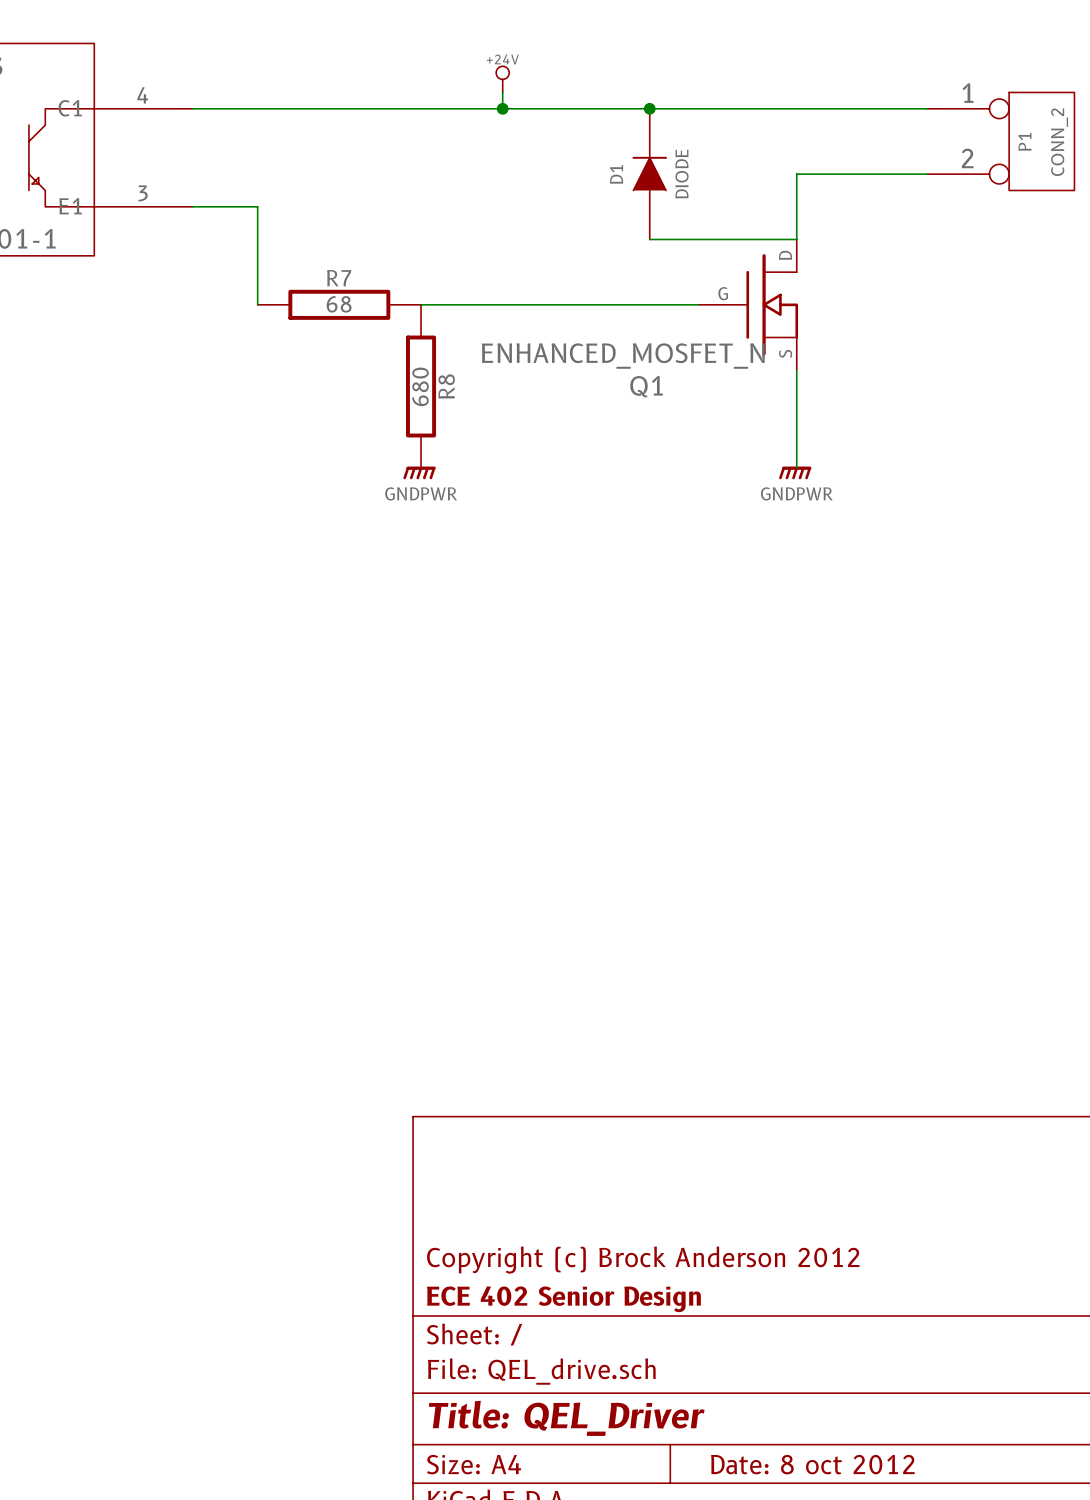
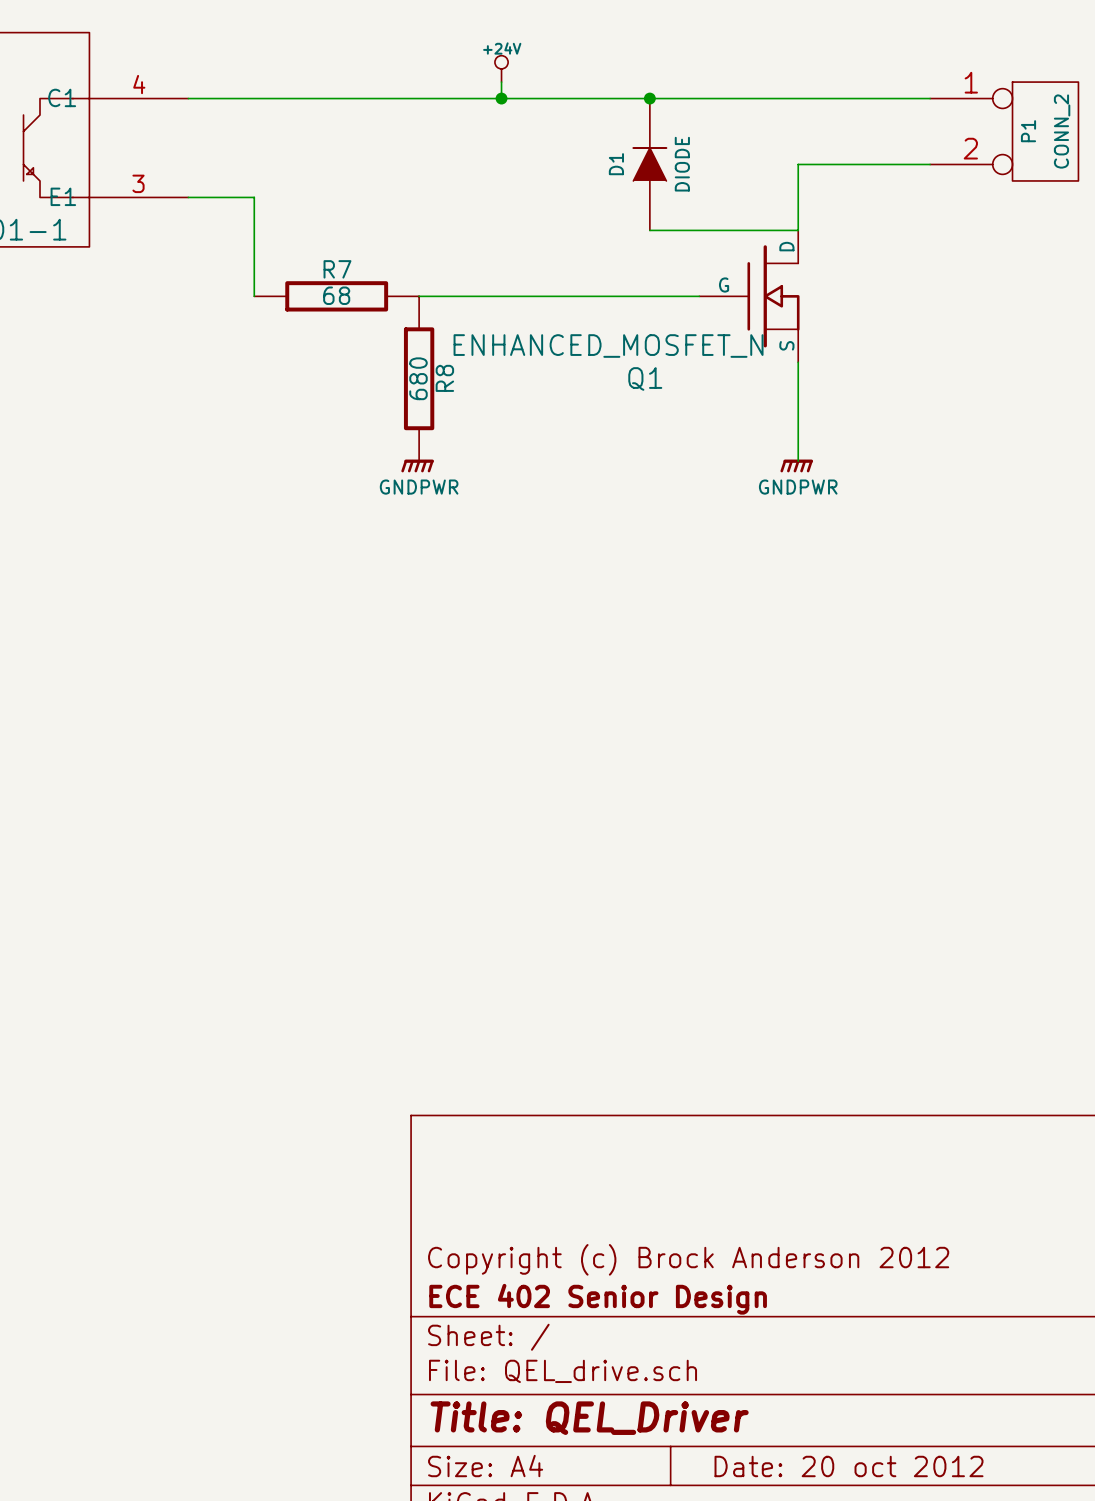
title block: Date: 8 oct 2012 (812, 1464) -> Date: 20 oct 2012 (849, 1466)

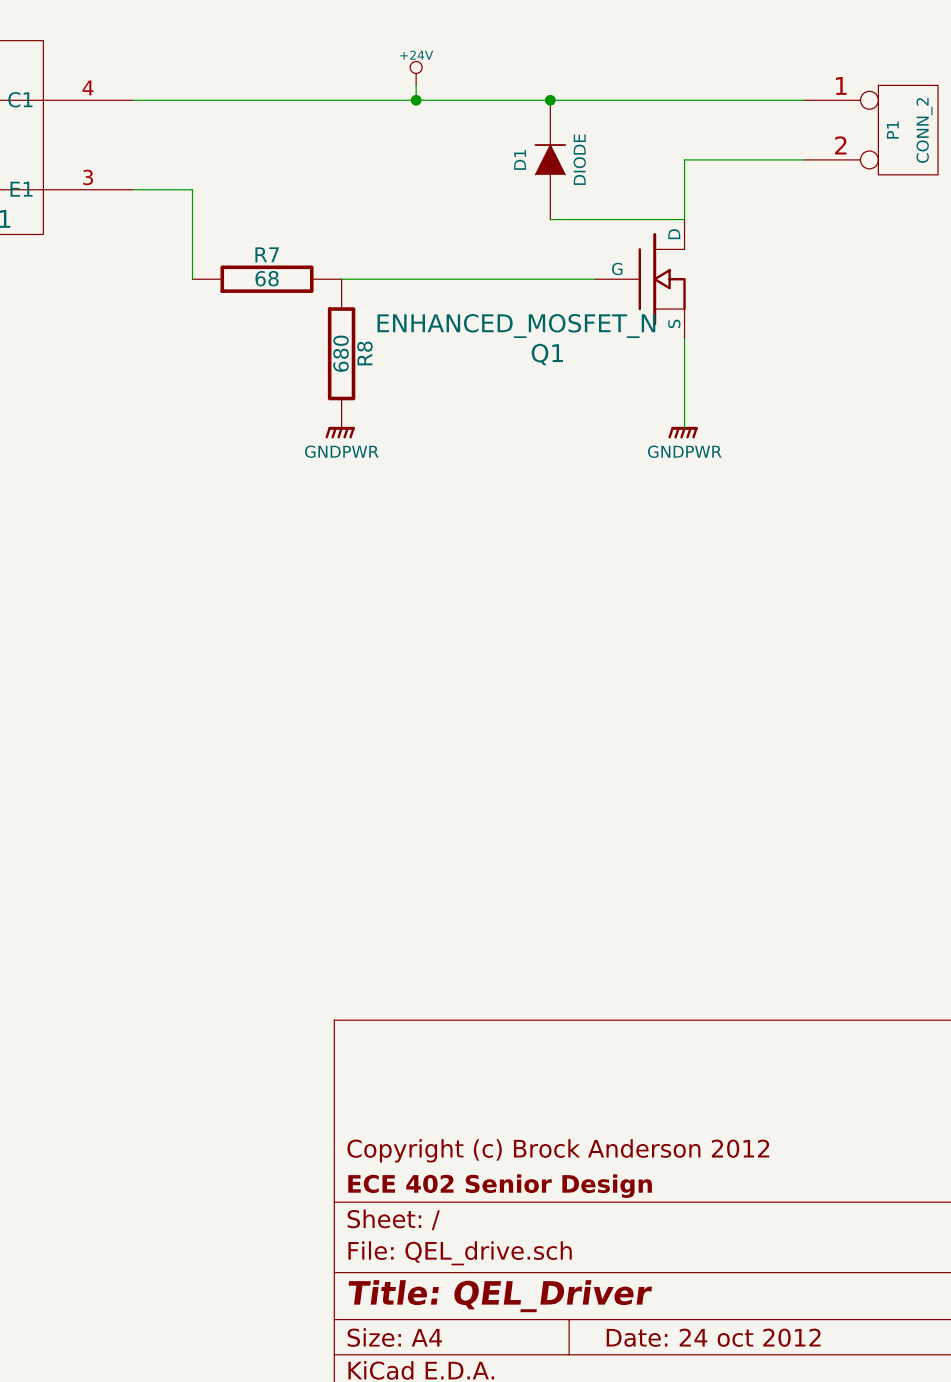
title block: Date: 20 oct 2012 (849, 1466) -> Date: 24 oct 2012 (713, 1337)

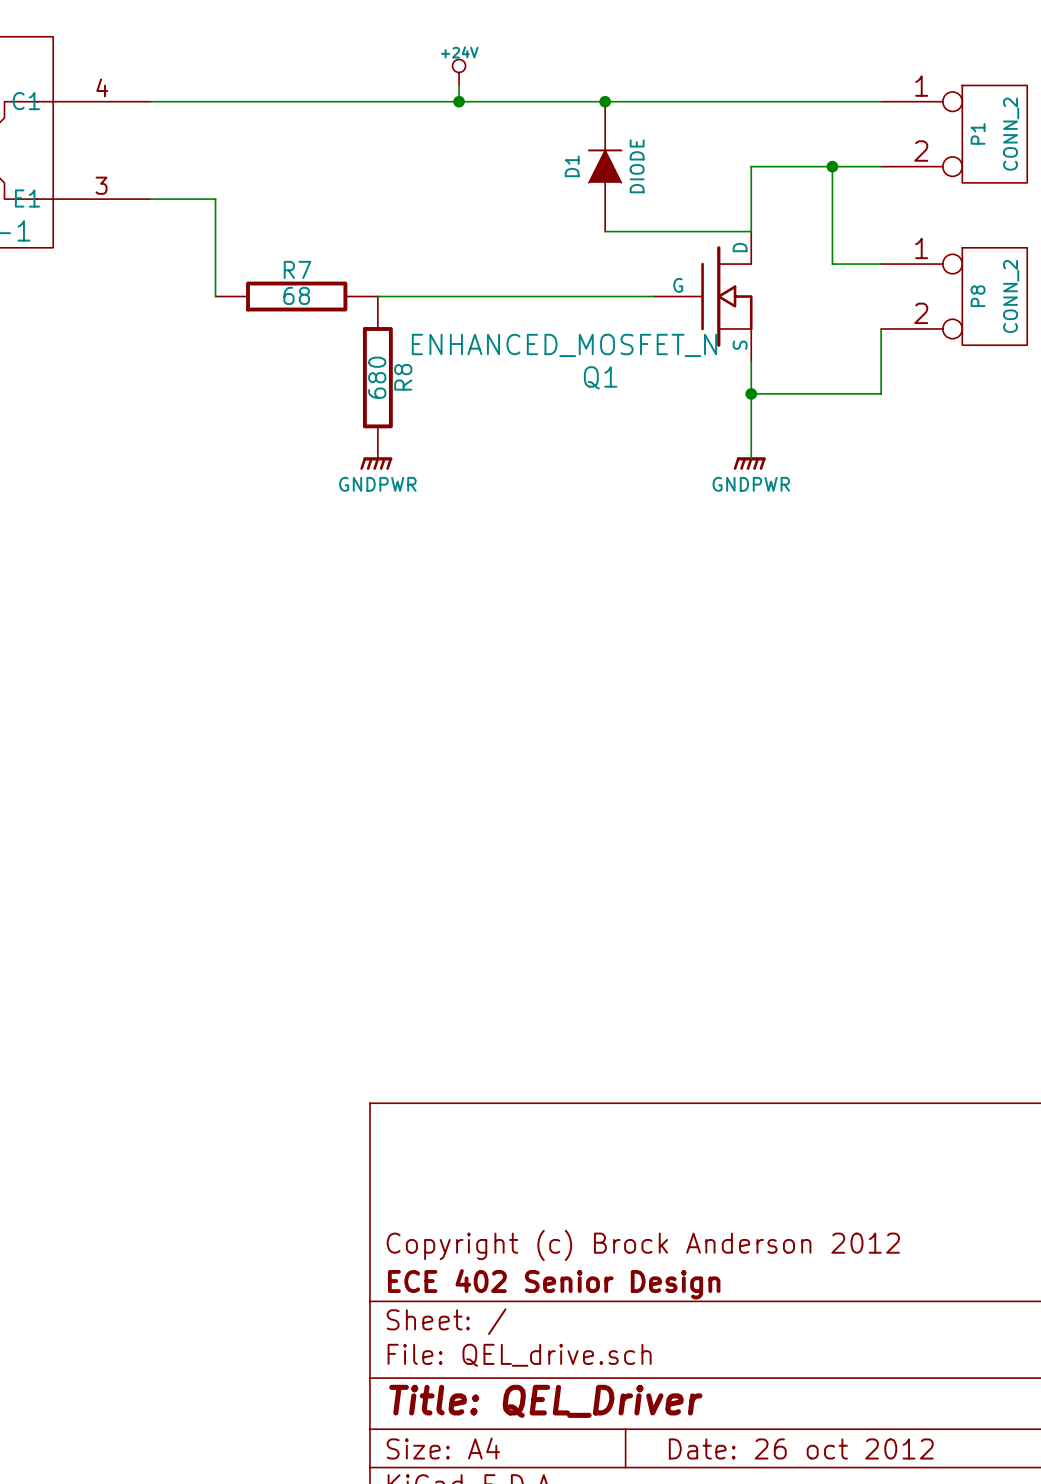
wire: none -> (832, 166) (832, 264) (881, 264)
junction: none -> (832, 166)
P8: none -> CONN_2 (954, 296)
wire: none -> (881, 328) (881, 393) (751, 393)
junction: none -> (751, 393)
title block: Date: 24 oct 2012 (713, 1337) -> Date: 26 oct 2012 (801, 1448)

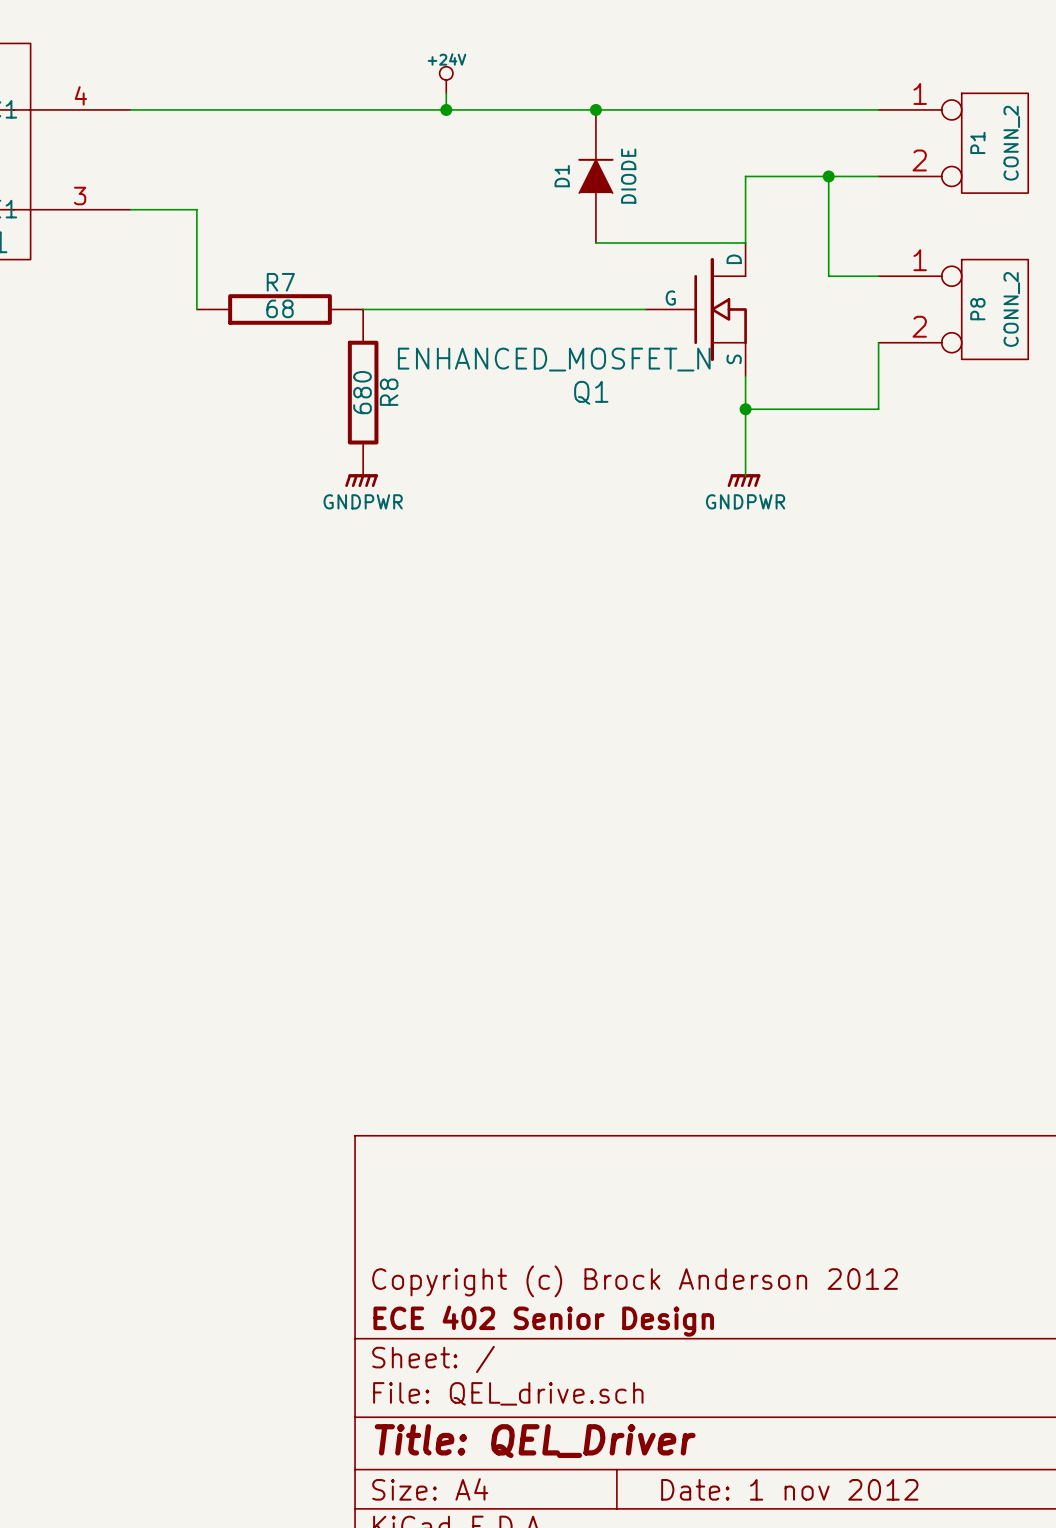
title block: Date: 26 oct 2012 (801, 1448) -> Date: 1 nov 2012 (789, 1489)

